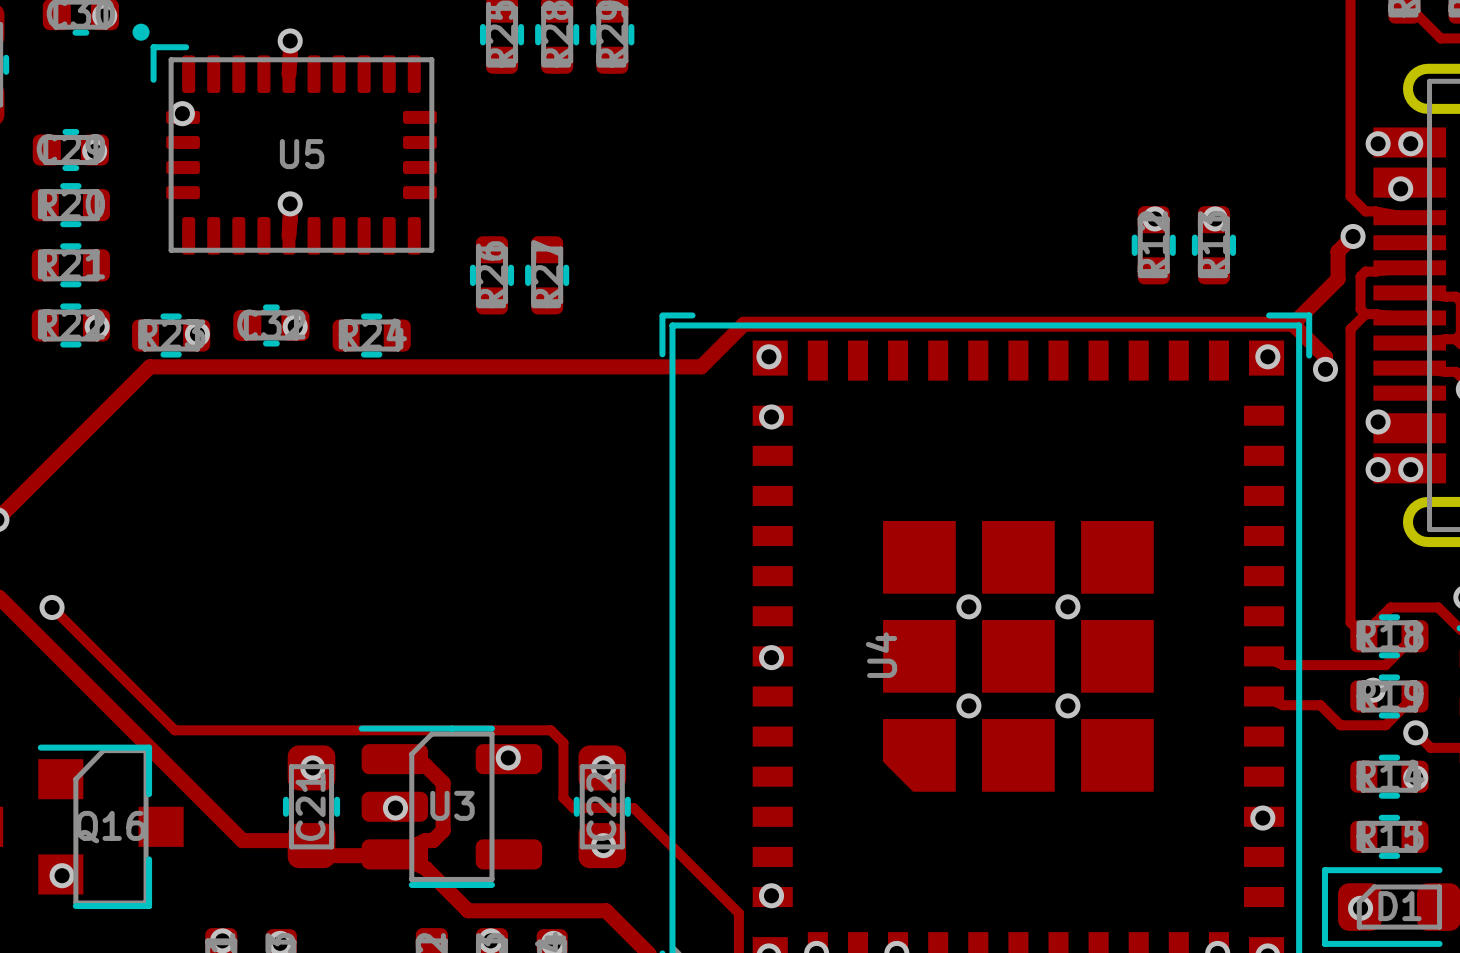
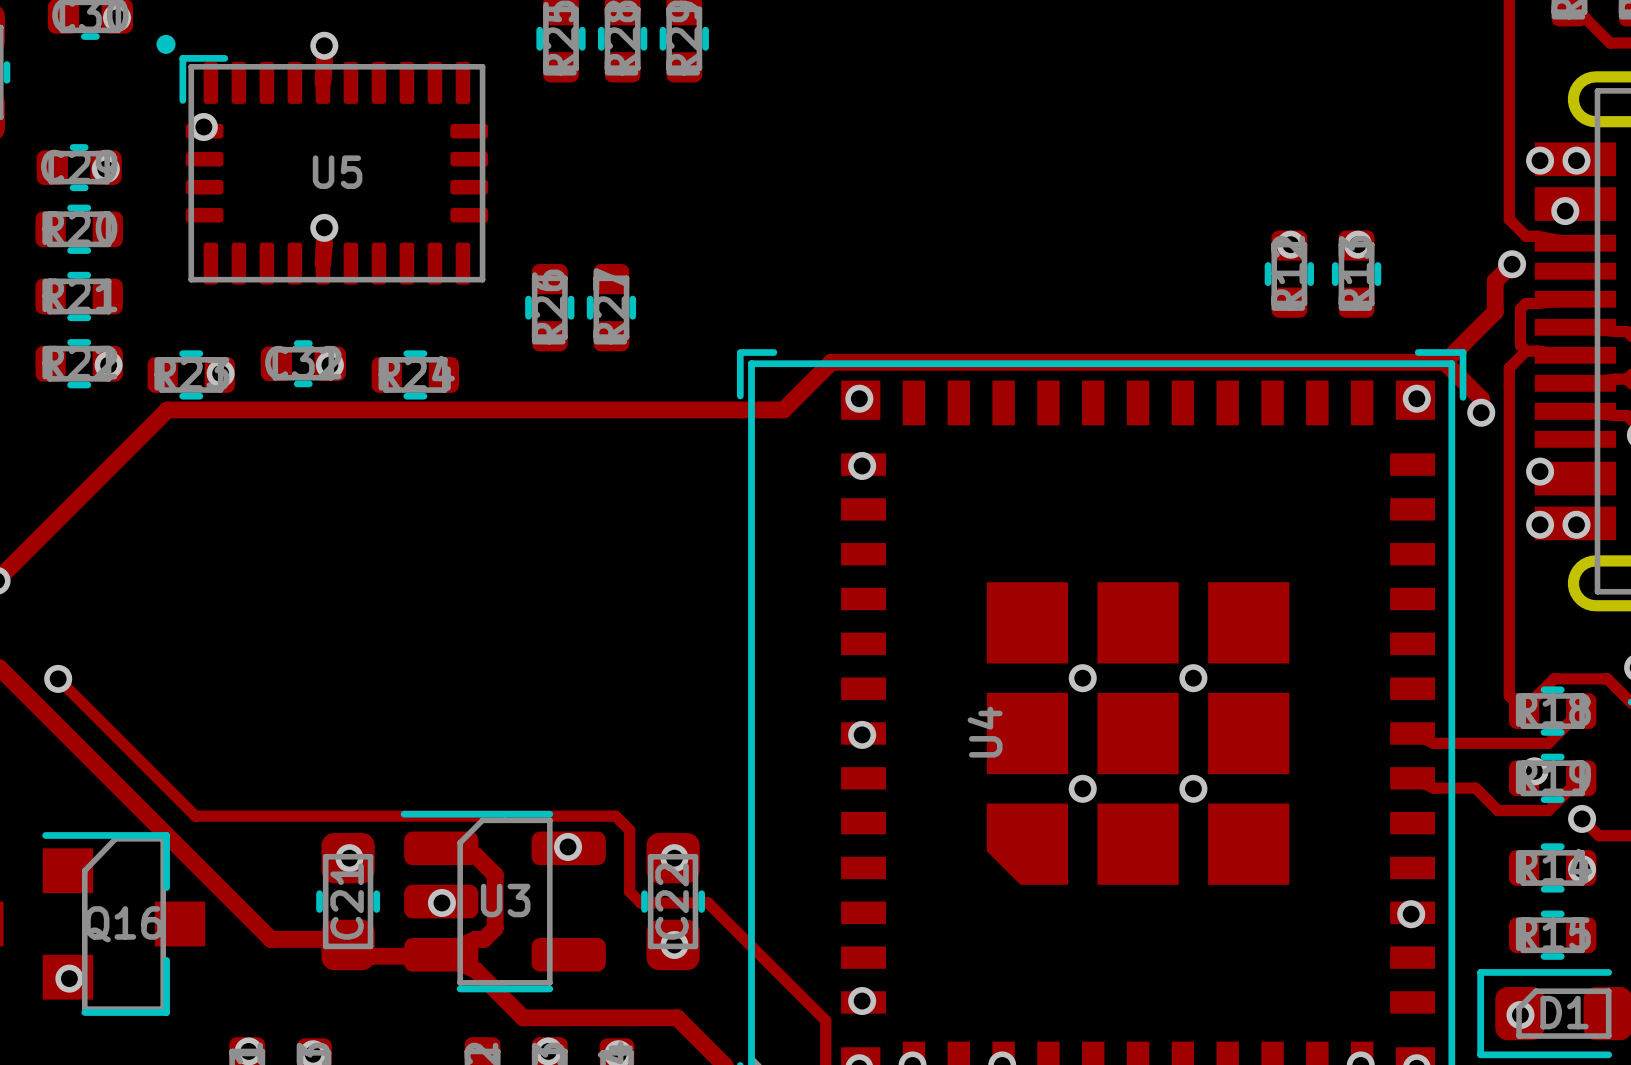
U5 footprint: [132, 23, 437, 255] -> [156, 34, 489, 285]

